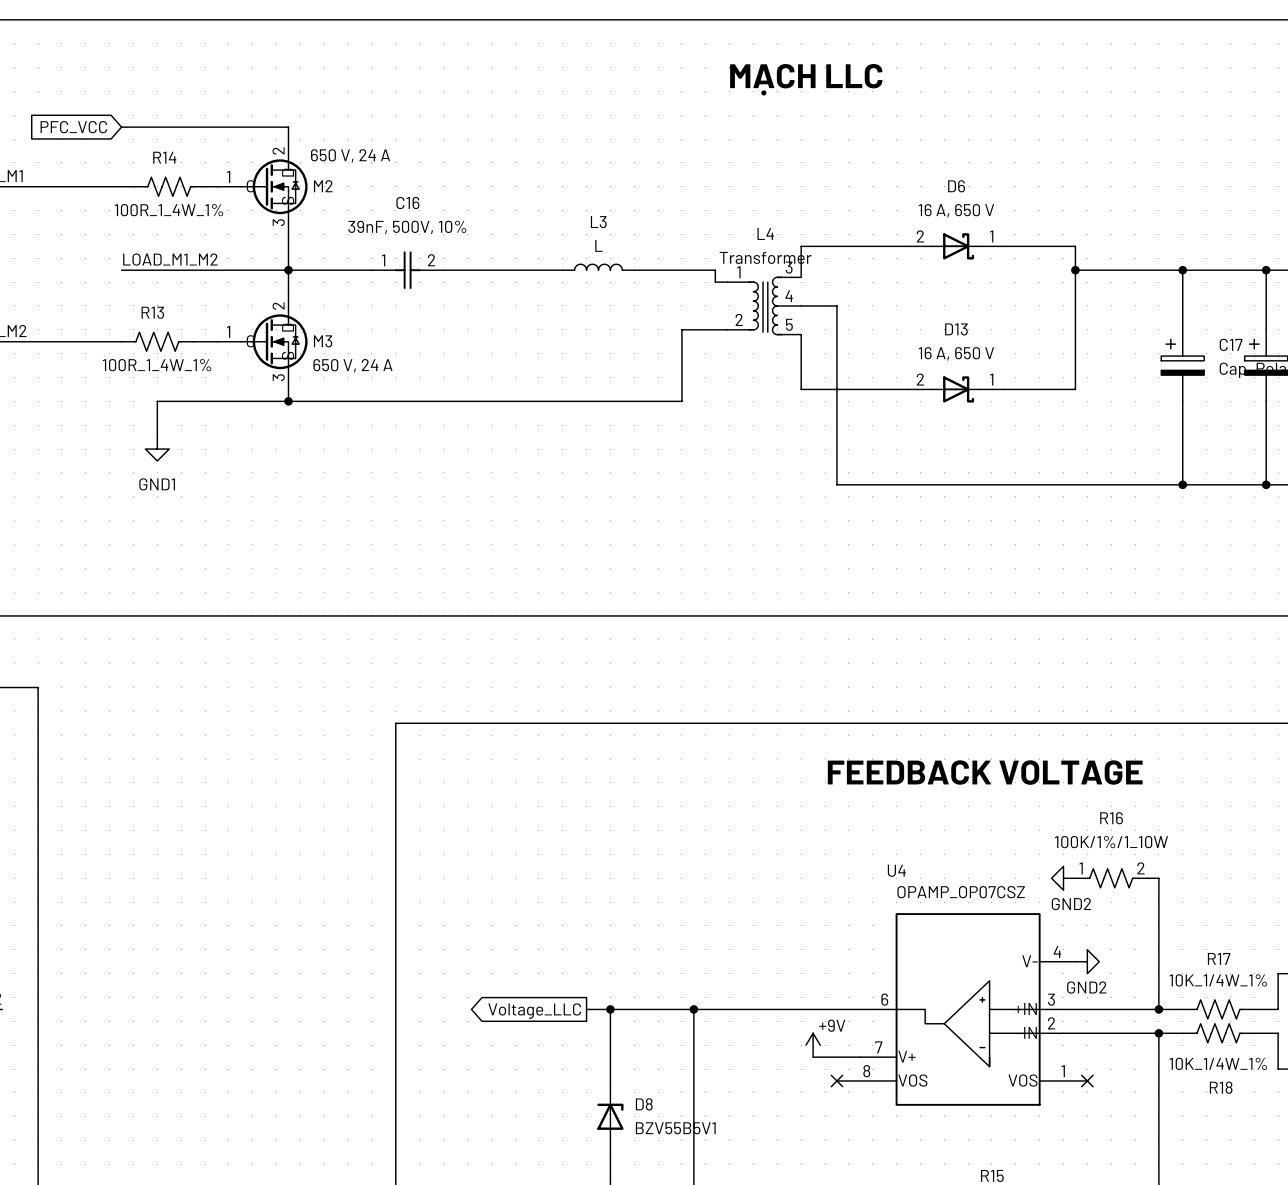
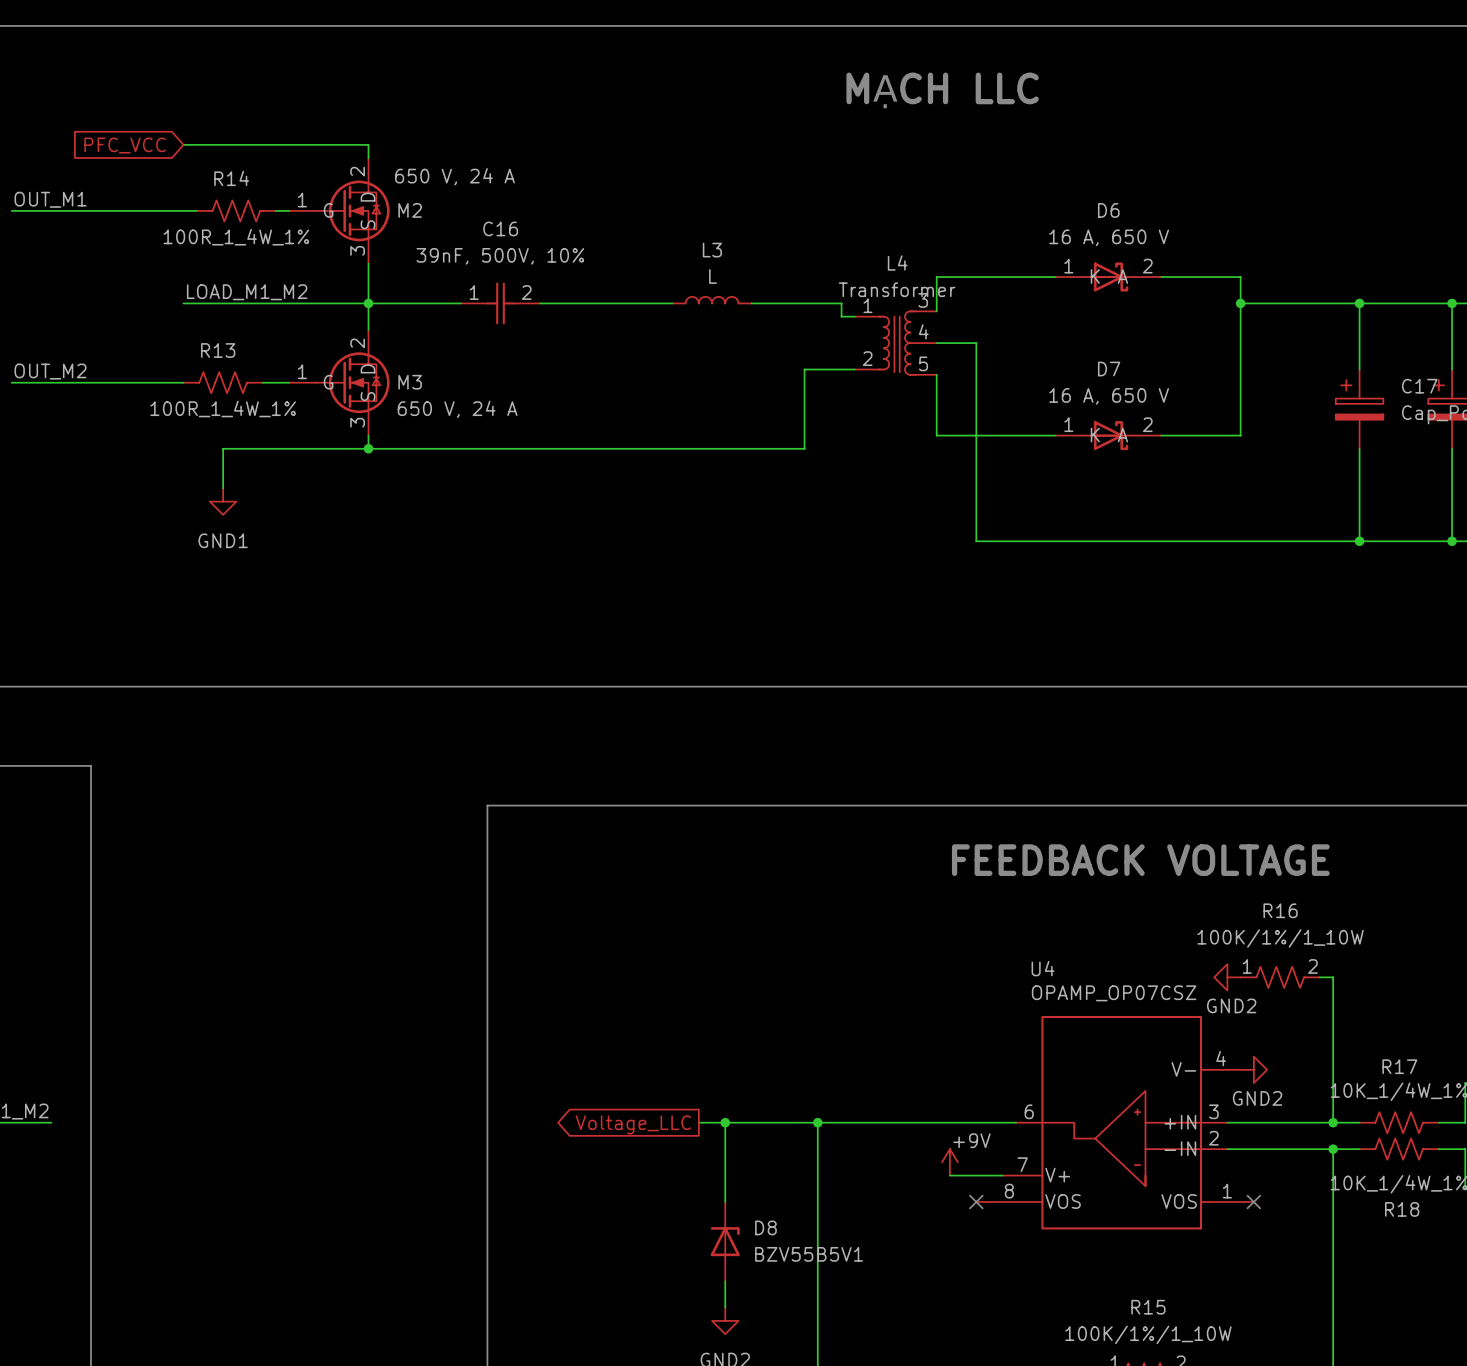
D6 pin number: 2 (920, 236) -> 1 (1068, 266)
D6 pin number: 1 (991, 236) -> 2 (1147, 266)
D6 pin name: none -> K (1095, 276)
D6 pin name: none -> A (1122, 276)
D13 name: D13 (956, 329) -> D7 (1109, 369)
D13 pin number: 2 (920, 379) -> 1 (1068, 424)
D13 pin number: 1 (991, 379) -> 2 (1147, 424)
D13 pin name: none -> K (1095, 435)
D13 pin name: none -> A (1122, 435)

